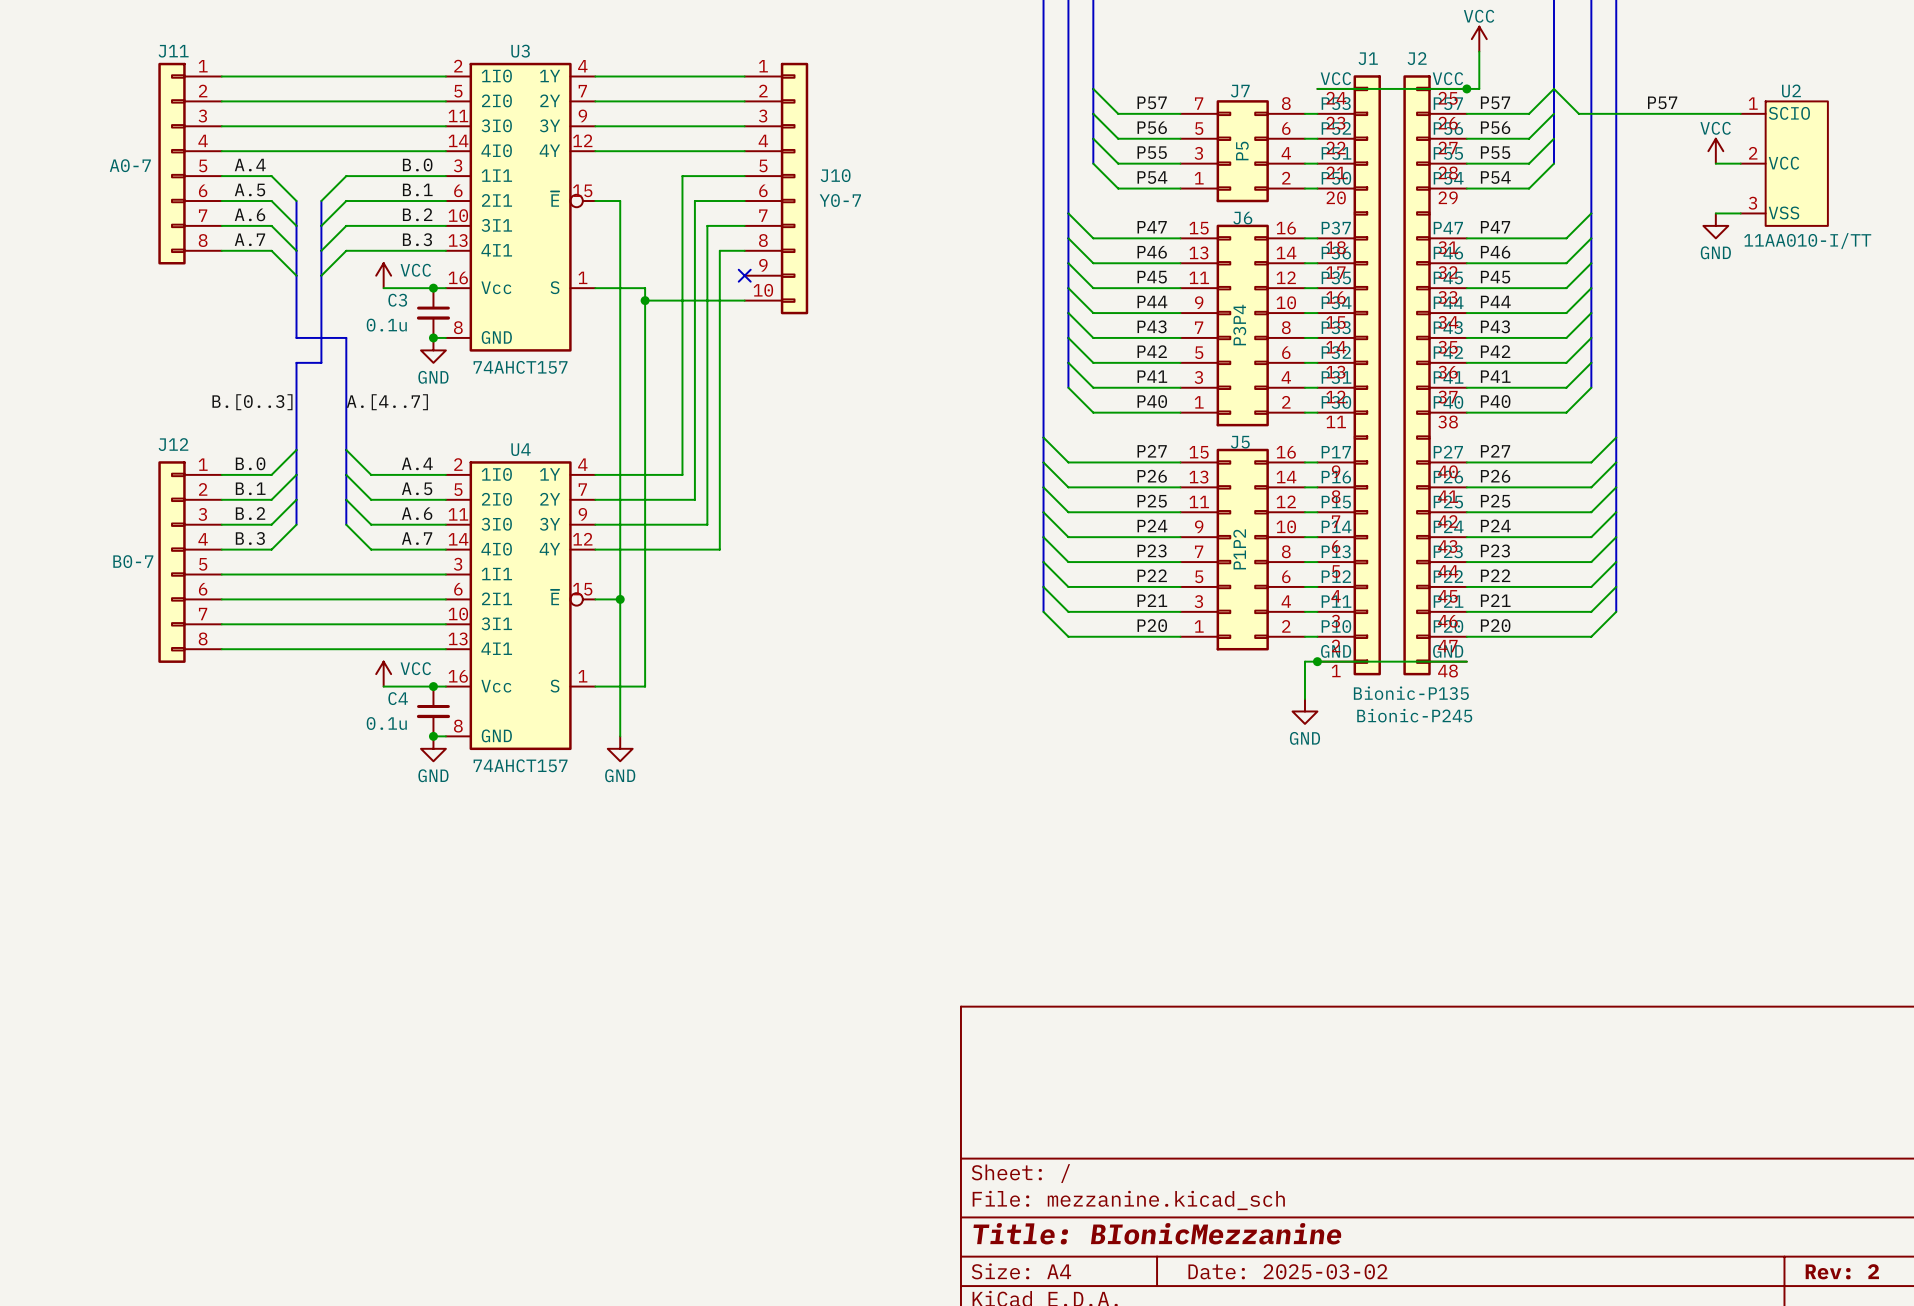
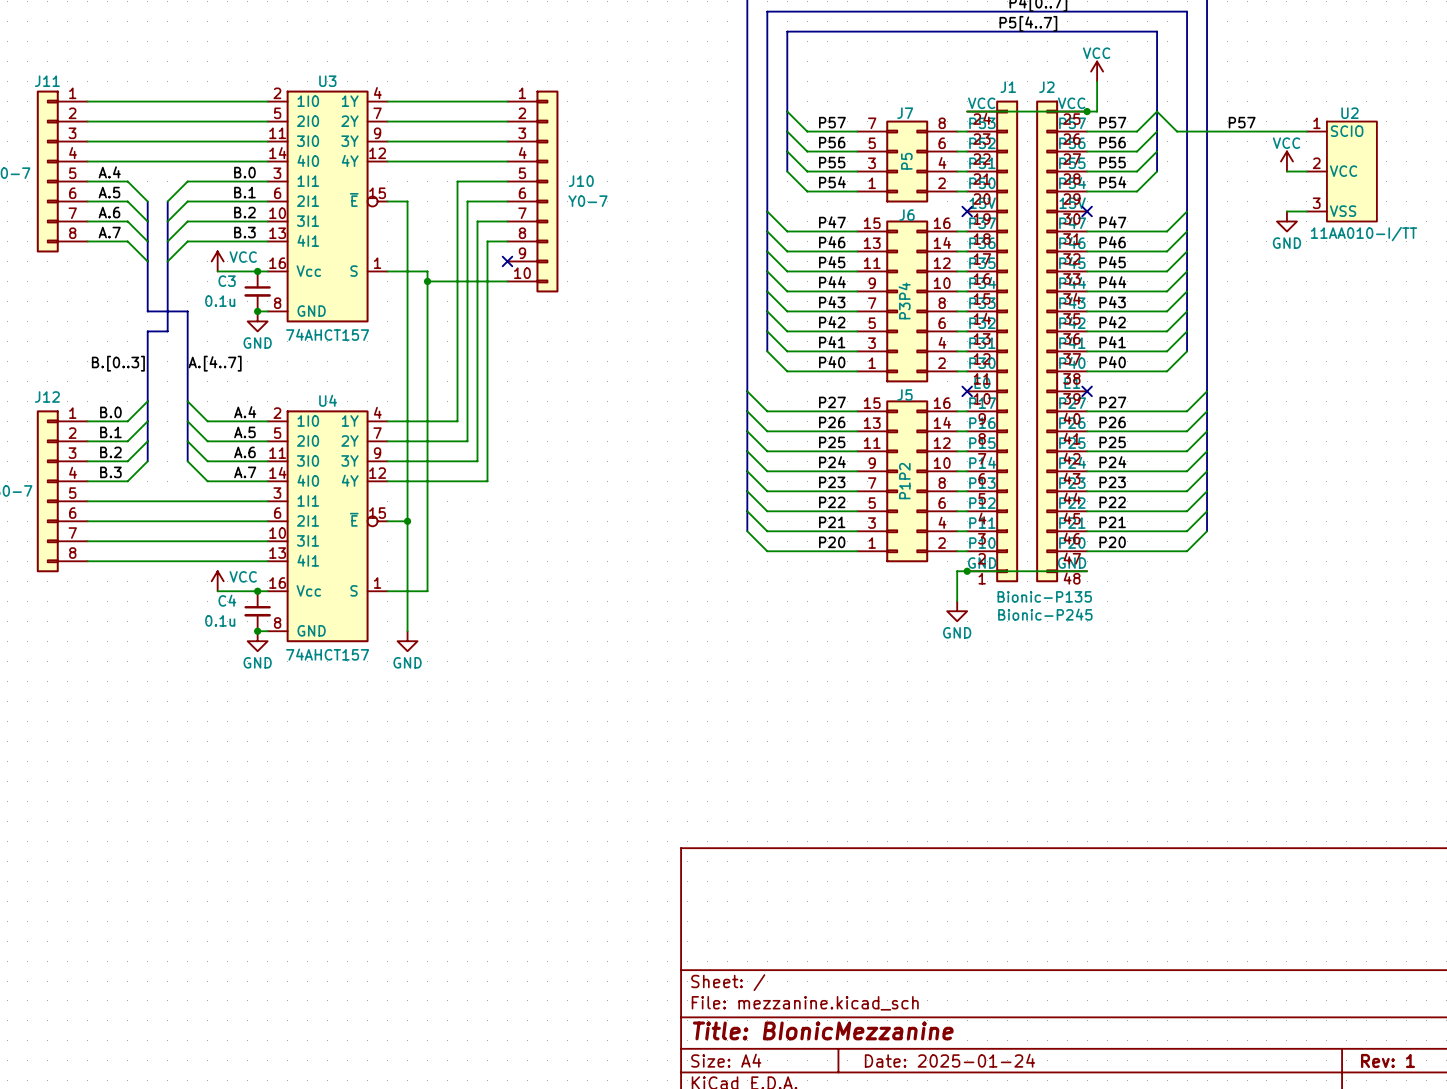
J1 symbol: [1317, 75, 1381, 676] -> [967, 100, 1019, 583]
J2 symbol: [1403, 75, 1467, 676] -> [1036, 100, 1088, 583]
no-connect mark: none -> (967, 211)
no-connect mark: none -> (1087, 211)
no-connect mark: none -> (967, 391)
no-connect mark: none -> (1087, 391)
title block: Date: 2025-03-02 (1287, 1271) -> Date: 2025-01-24 (949, 1060)
title block: Rev: 2 (1842, 1271) -> Rev: 1 (1388, 1060)

